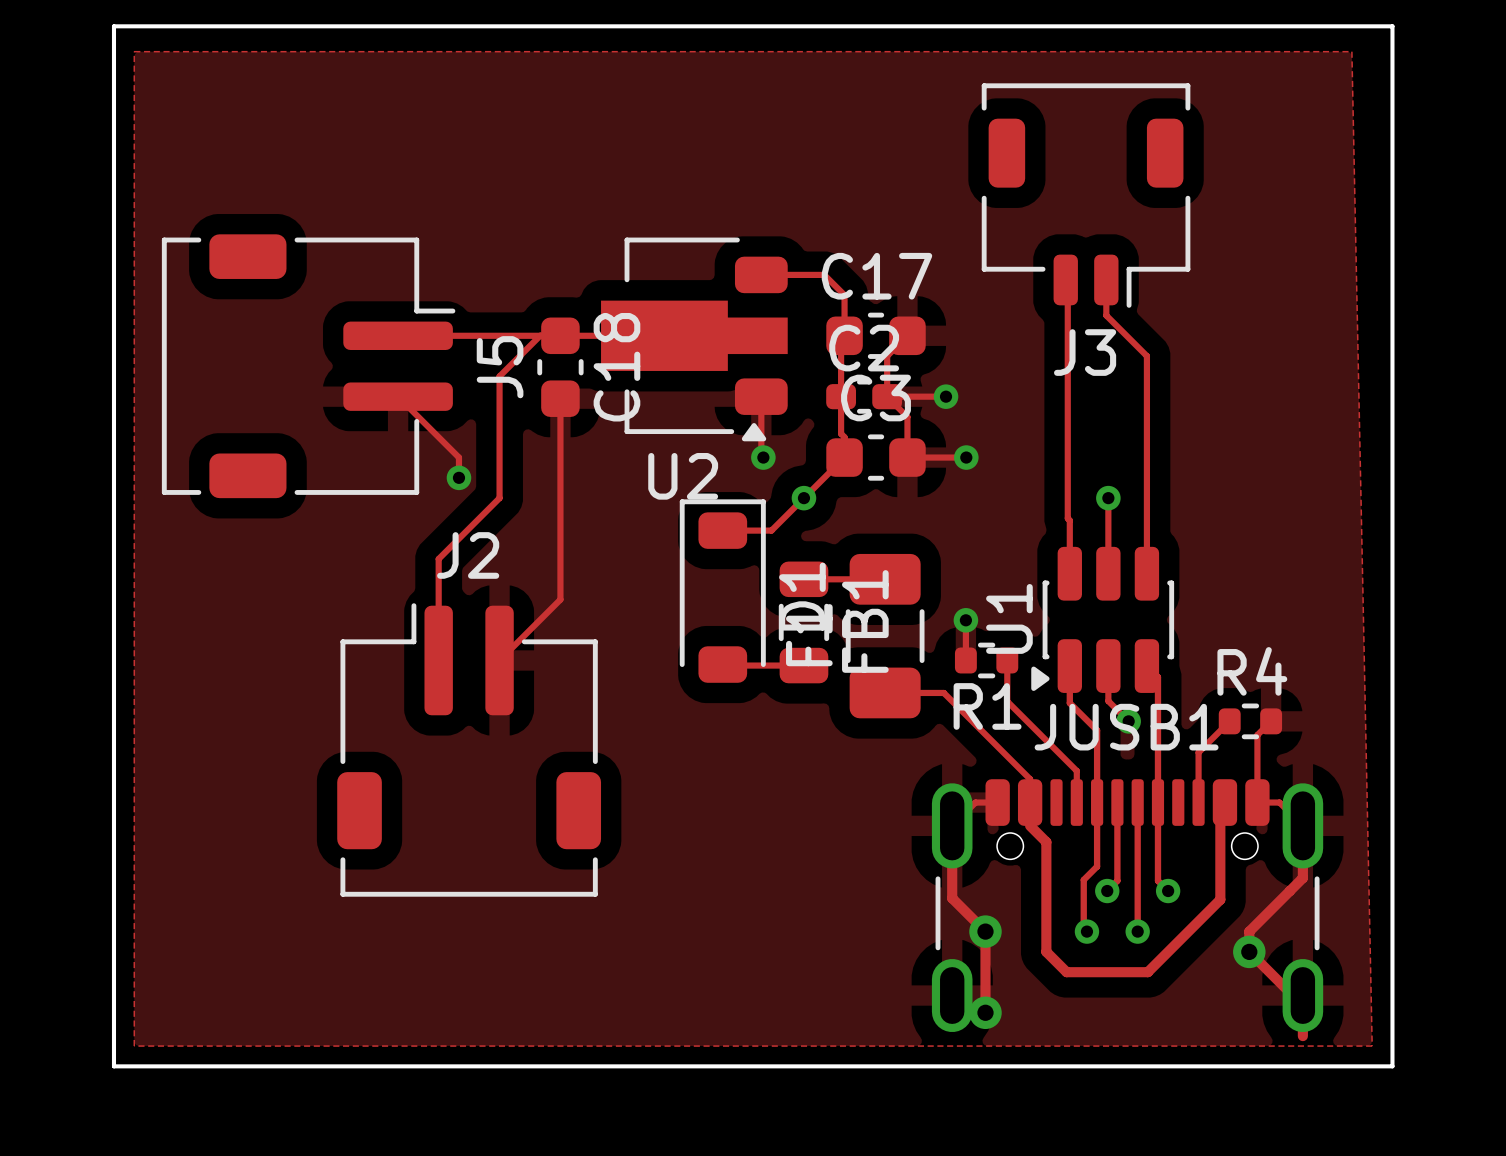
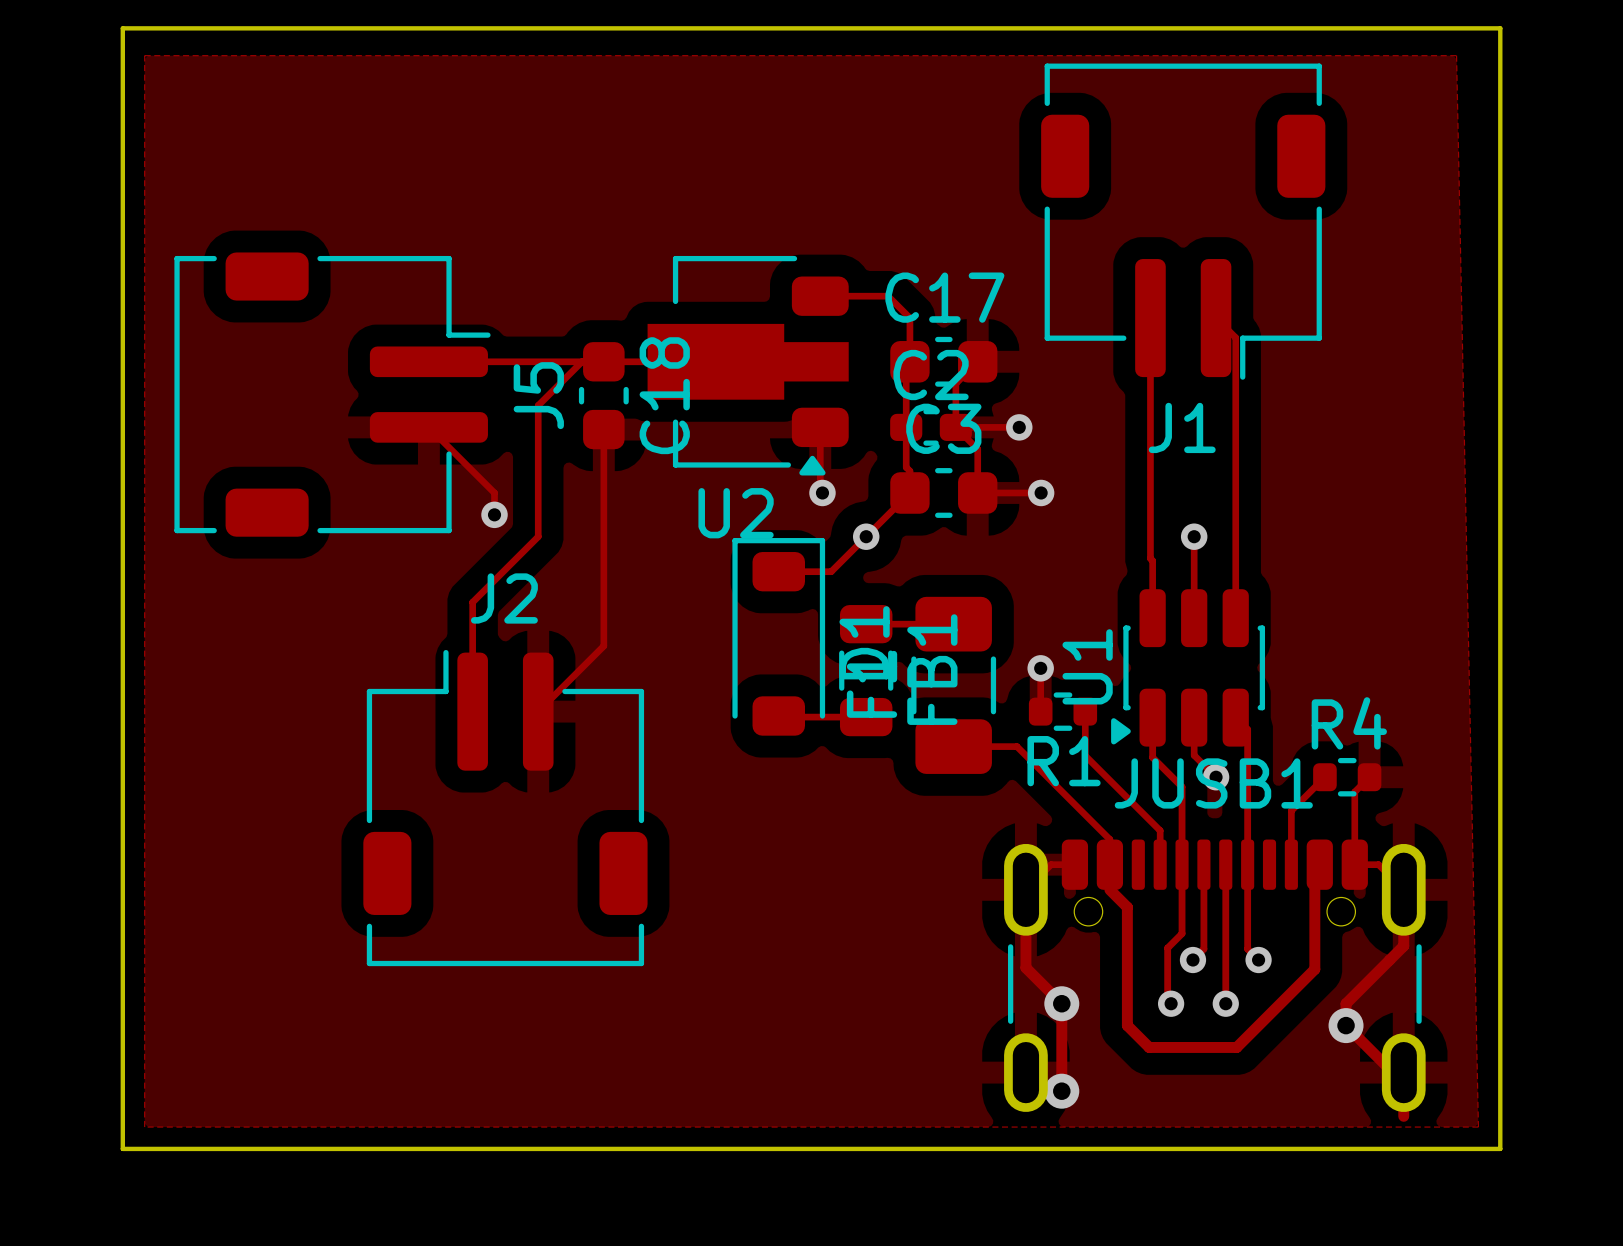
J3: (1086, 195) -> none
J1: none -> (1183, 221)
track: (1106, 279) (1106, 315) (1146, 356) -> (1216, 318) (1235, 337) (1235, 383)

